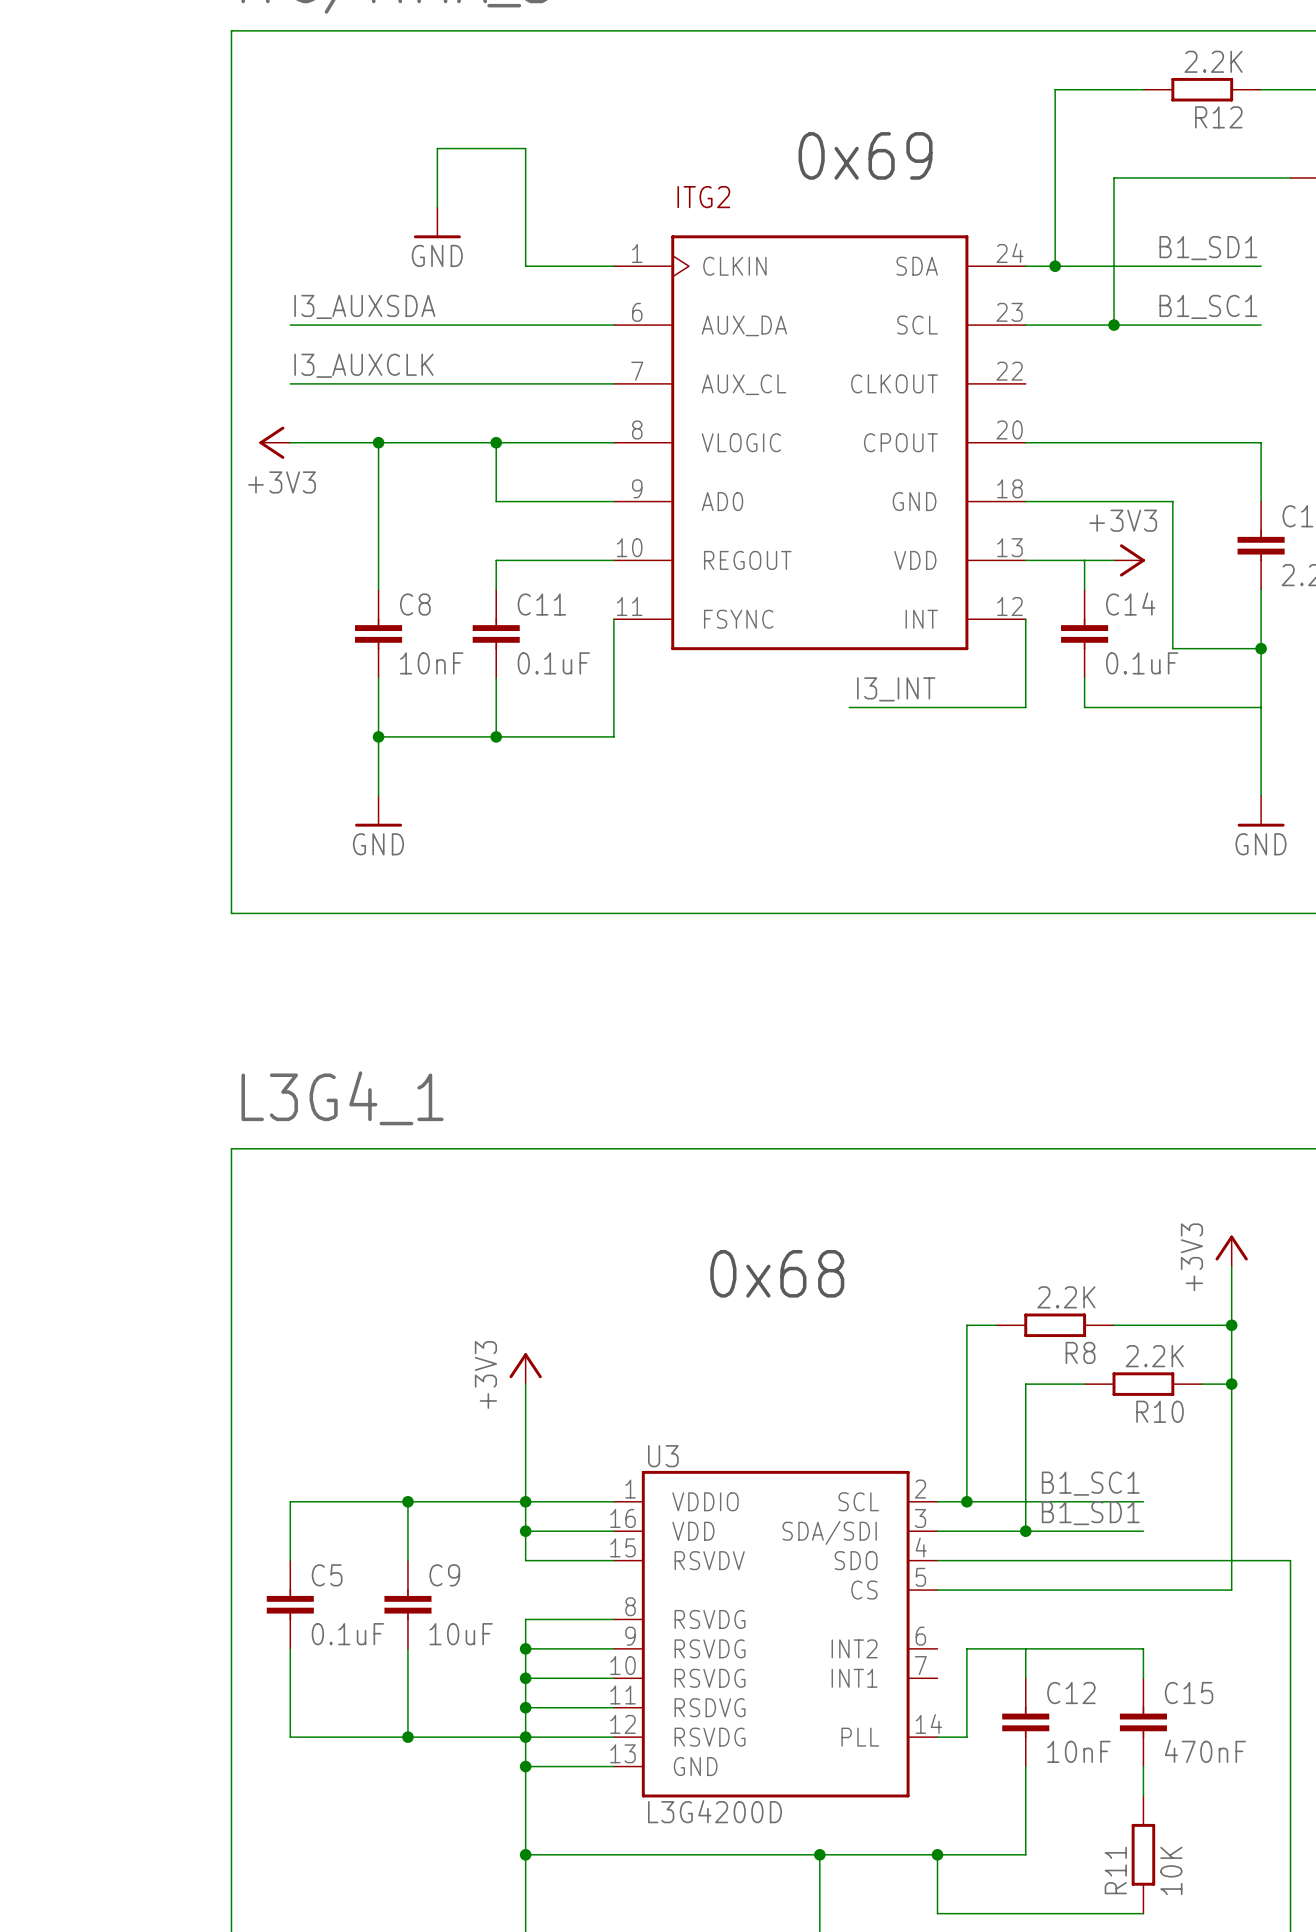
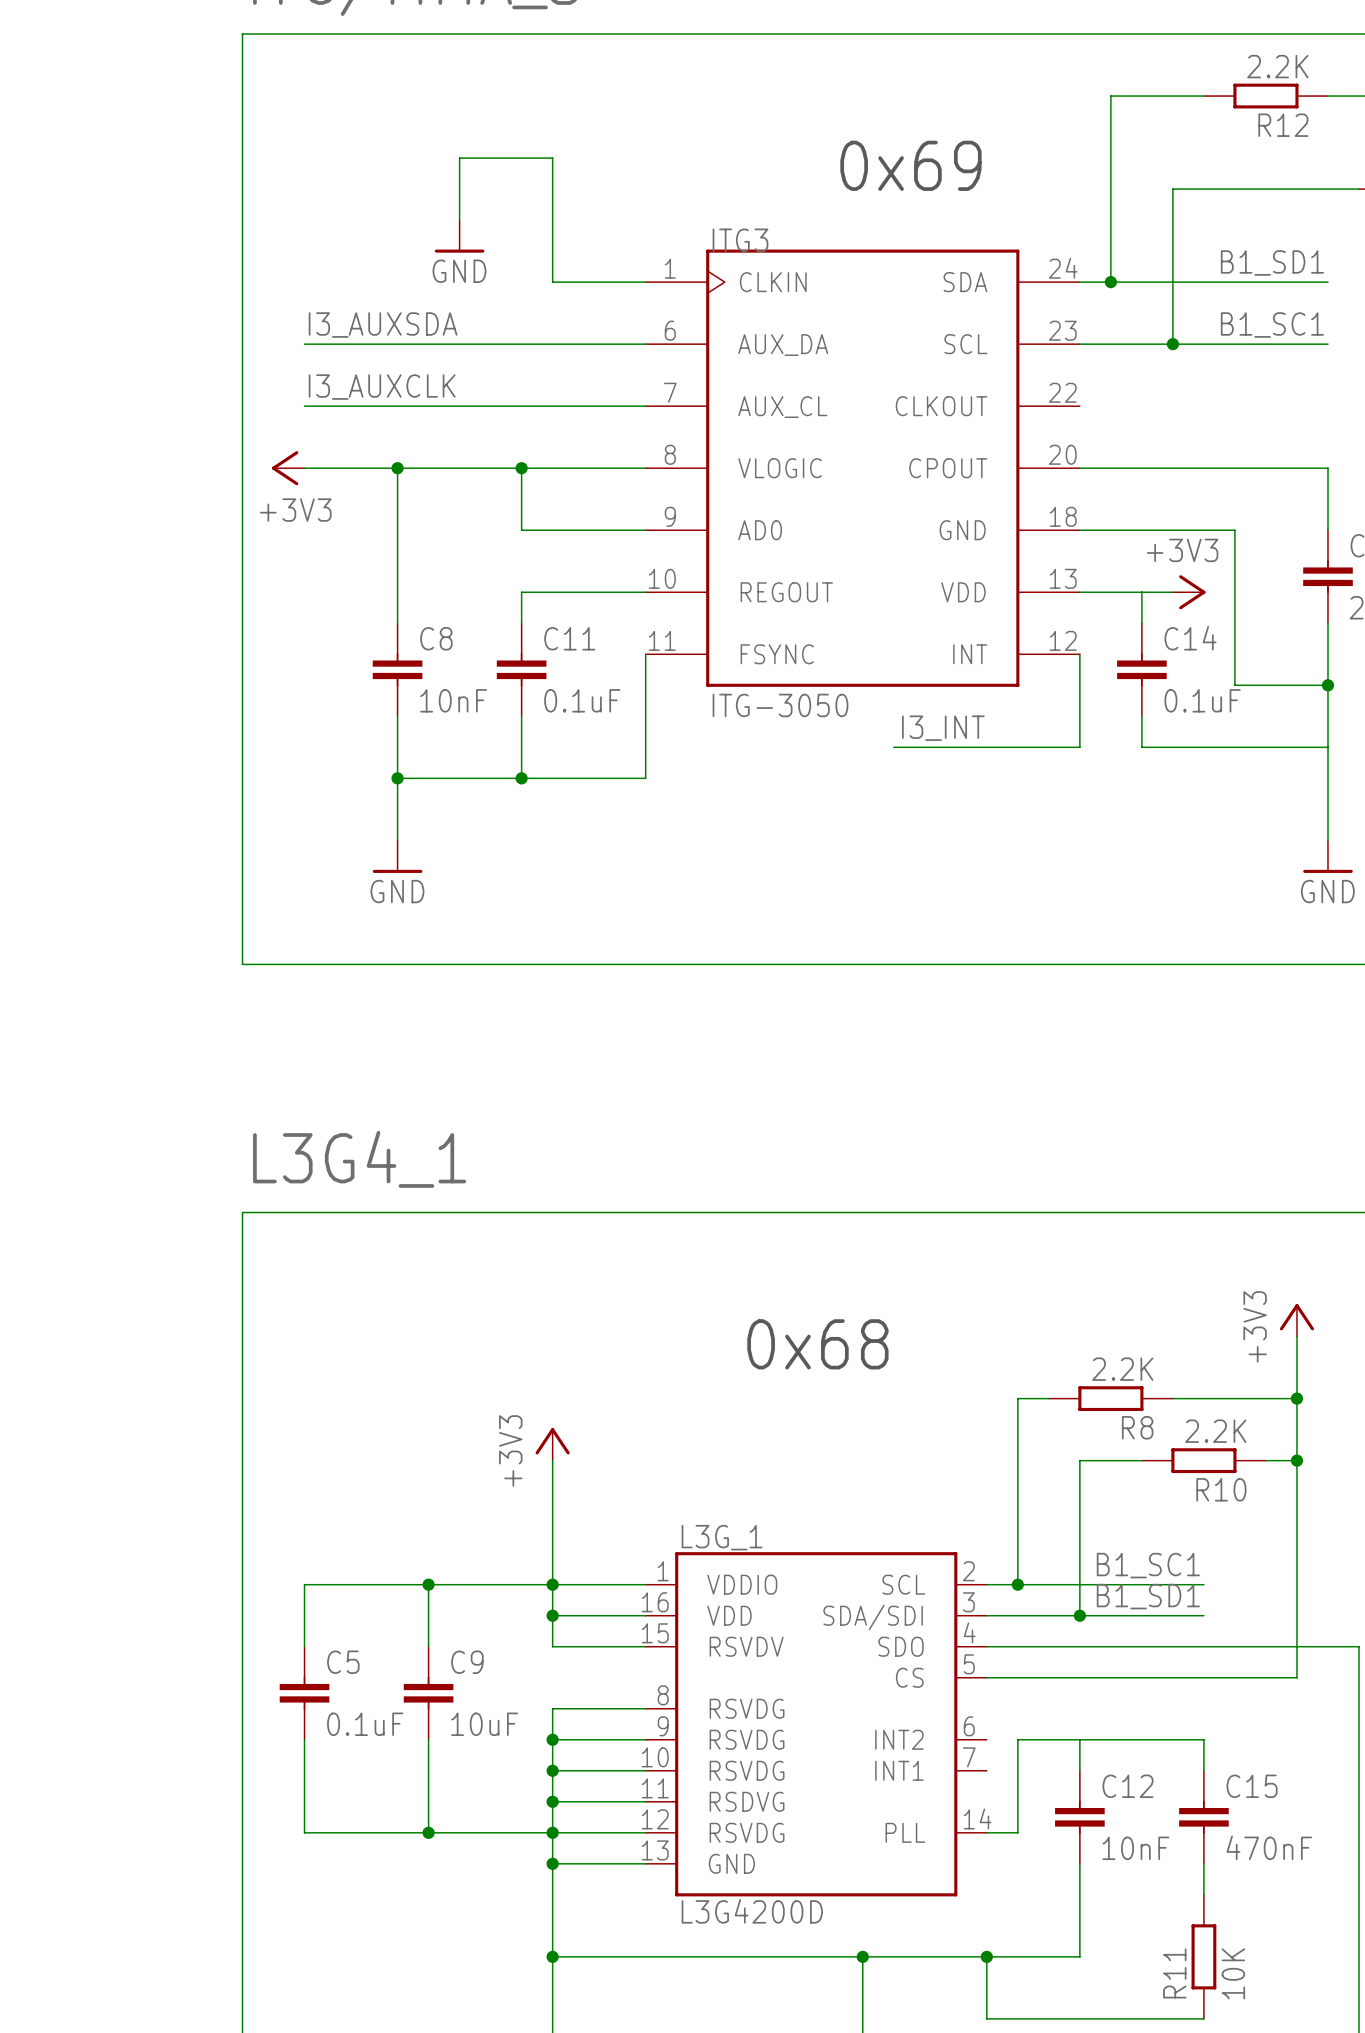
ITG2 name: ITG2 (703, 197) -> ITG3 (740, 240)
ITG2 value: none -> ITG-3050 (780, 705)
U3 name: U3 (663, 1456) -> L3G_1 (722, 1537)

